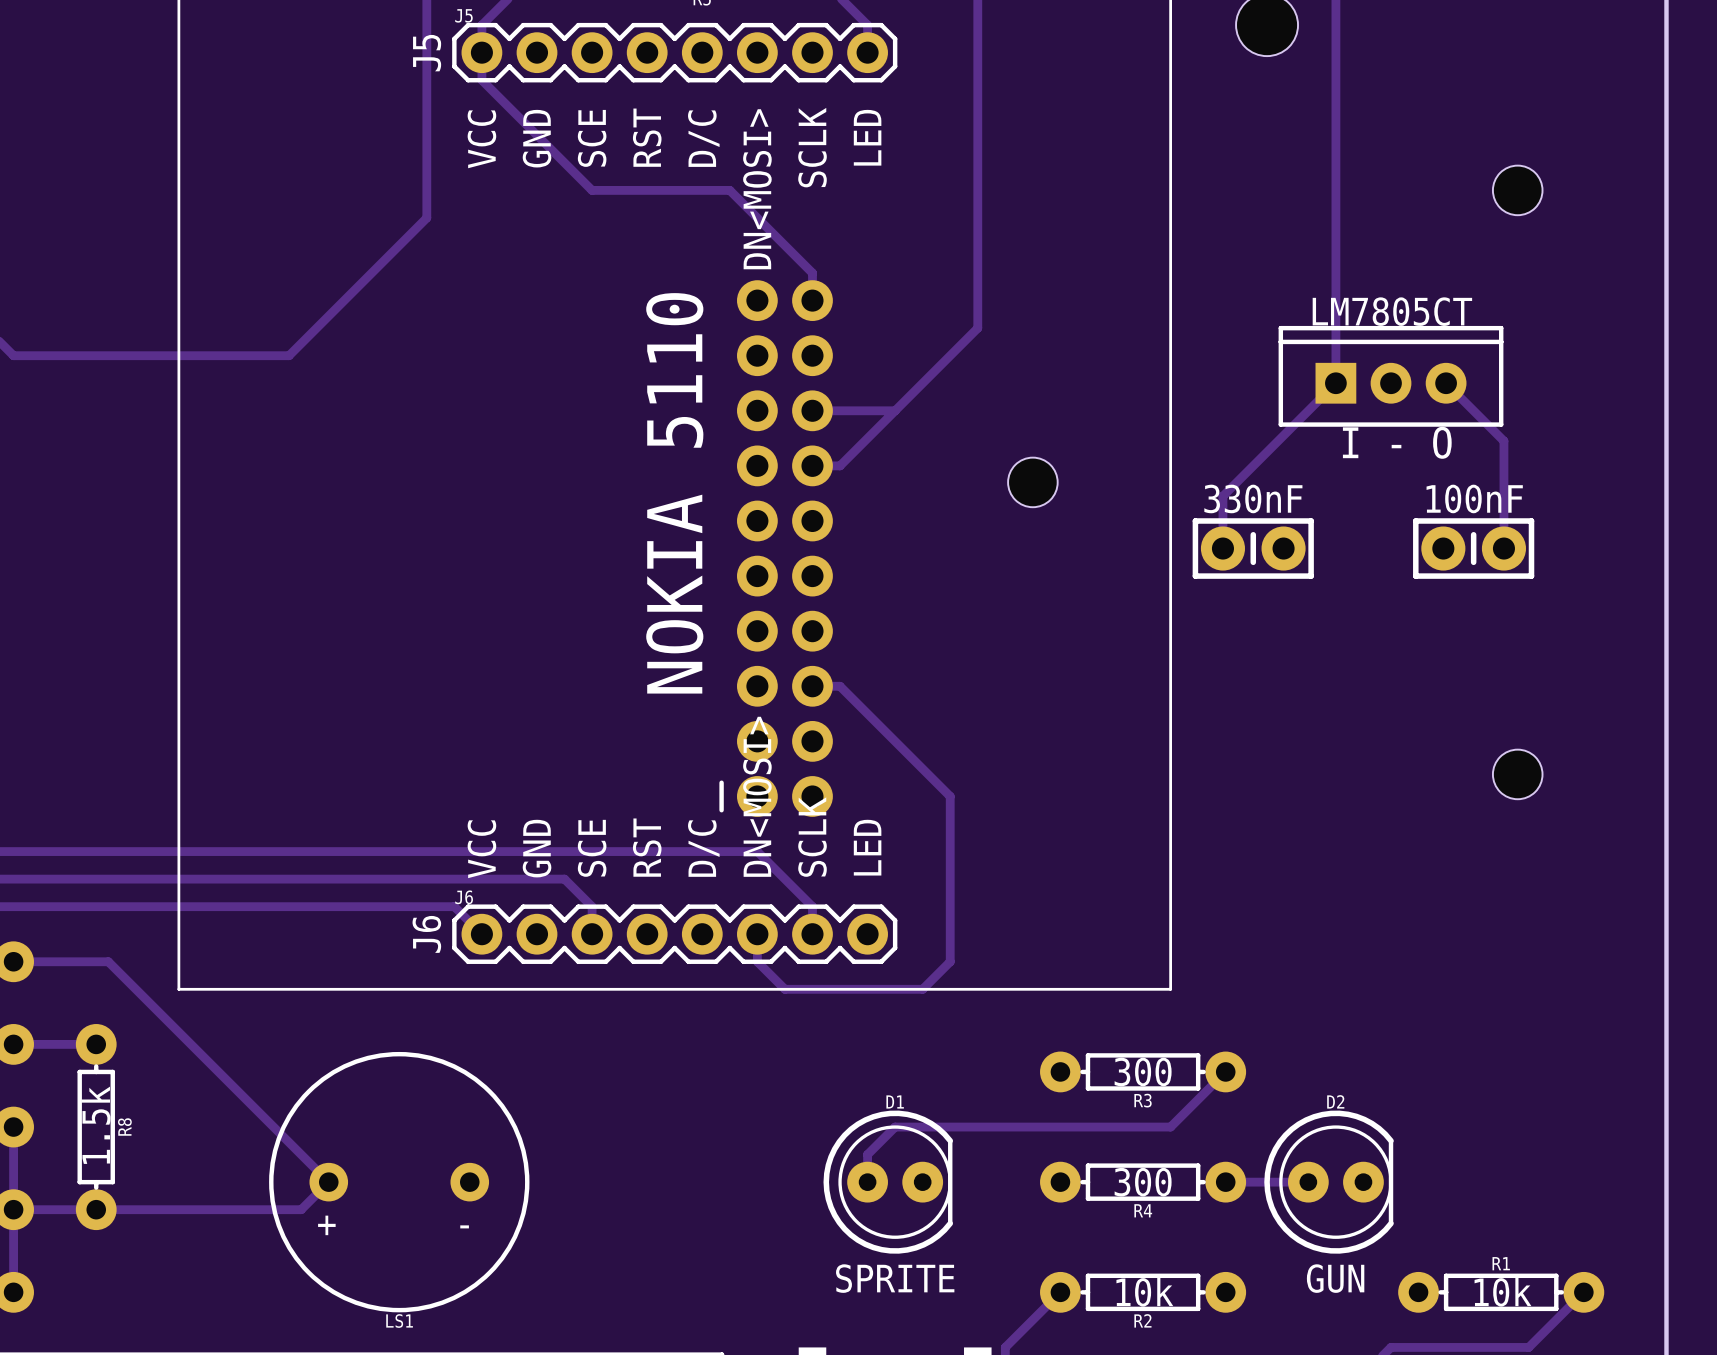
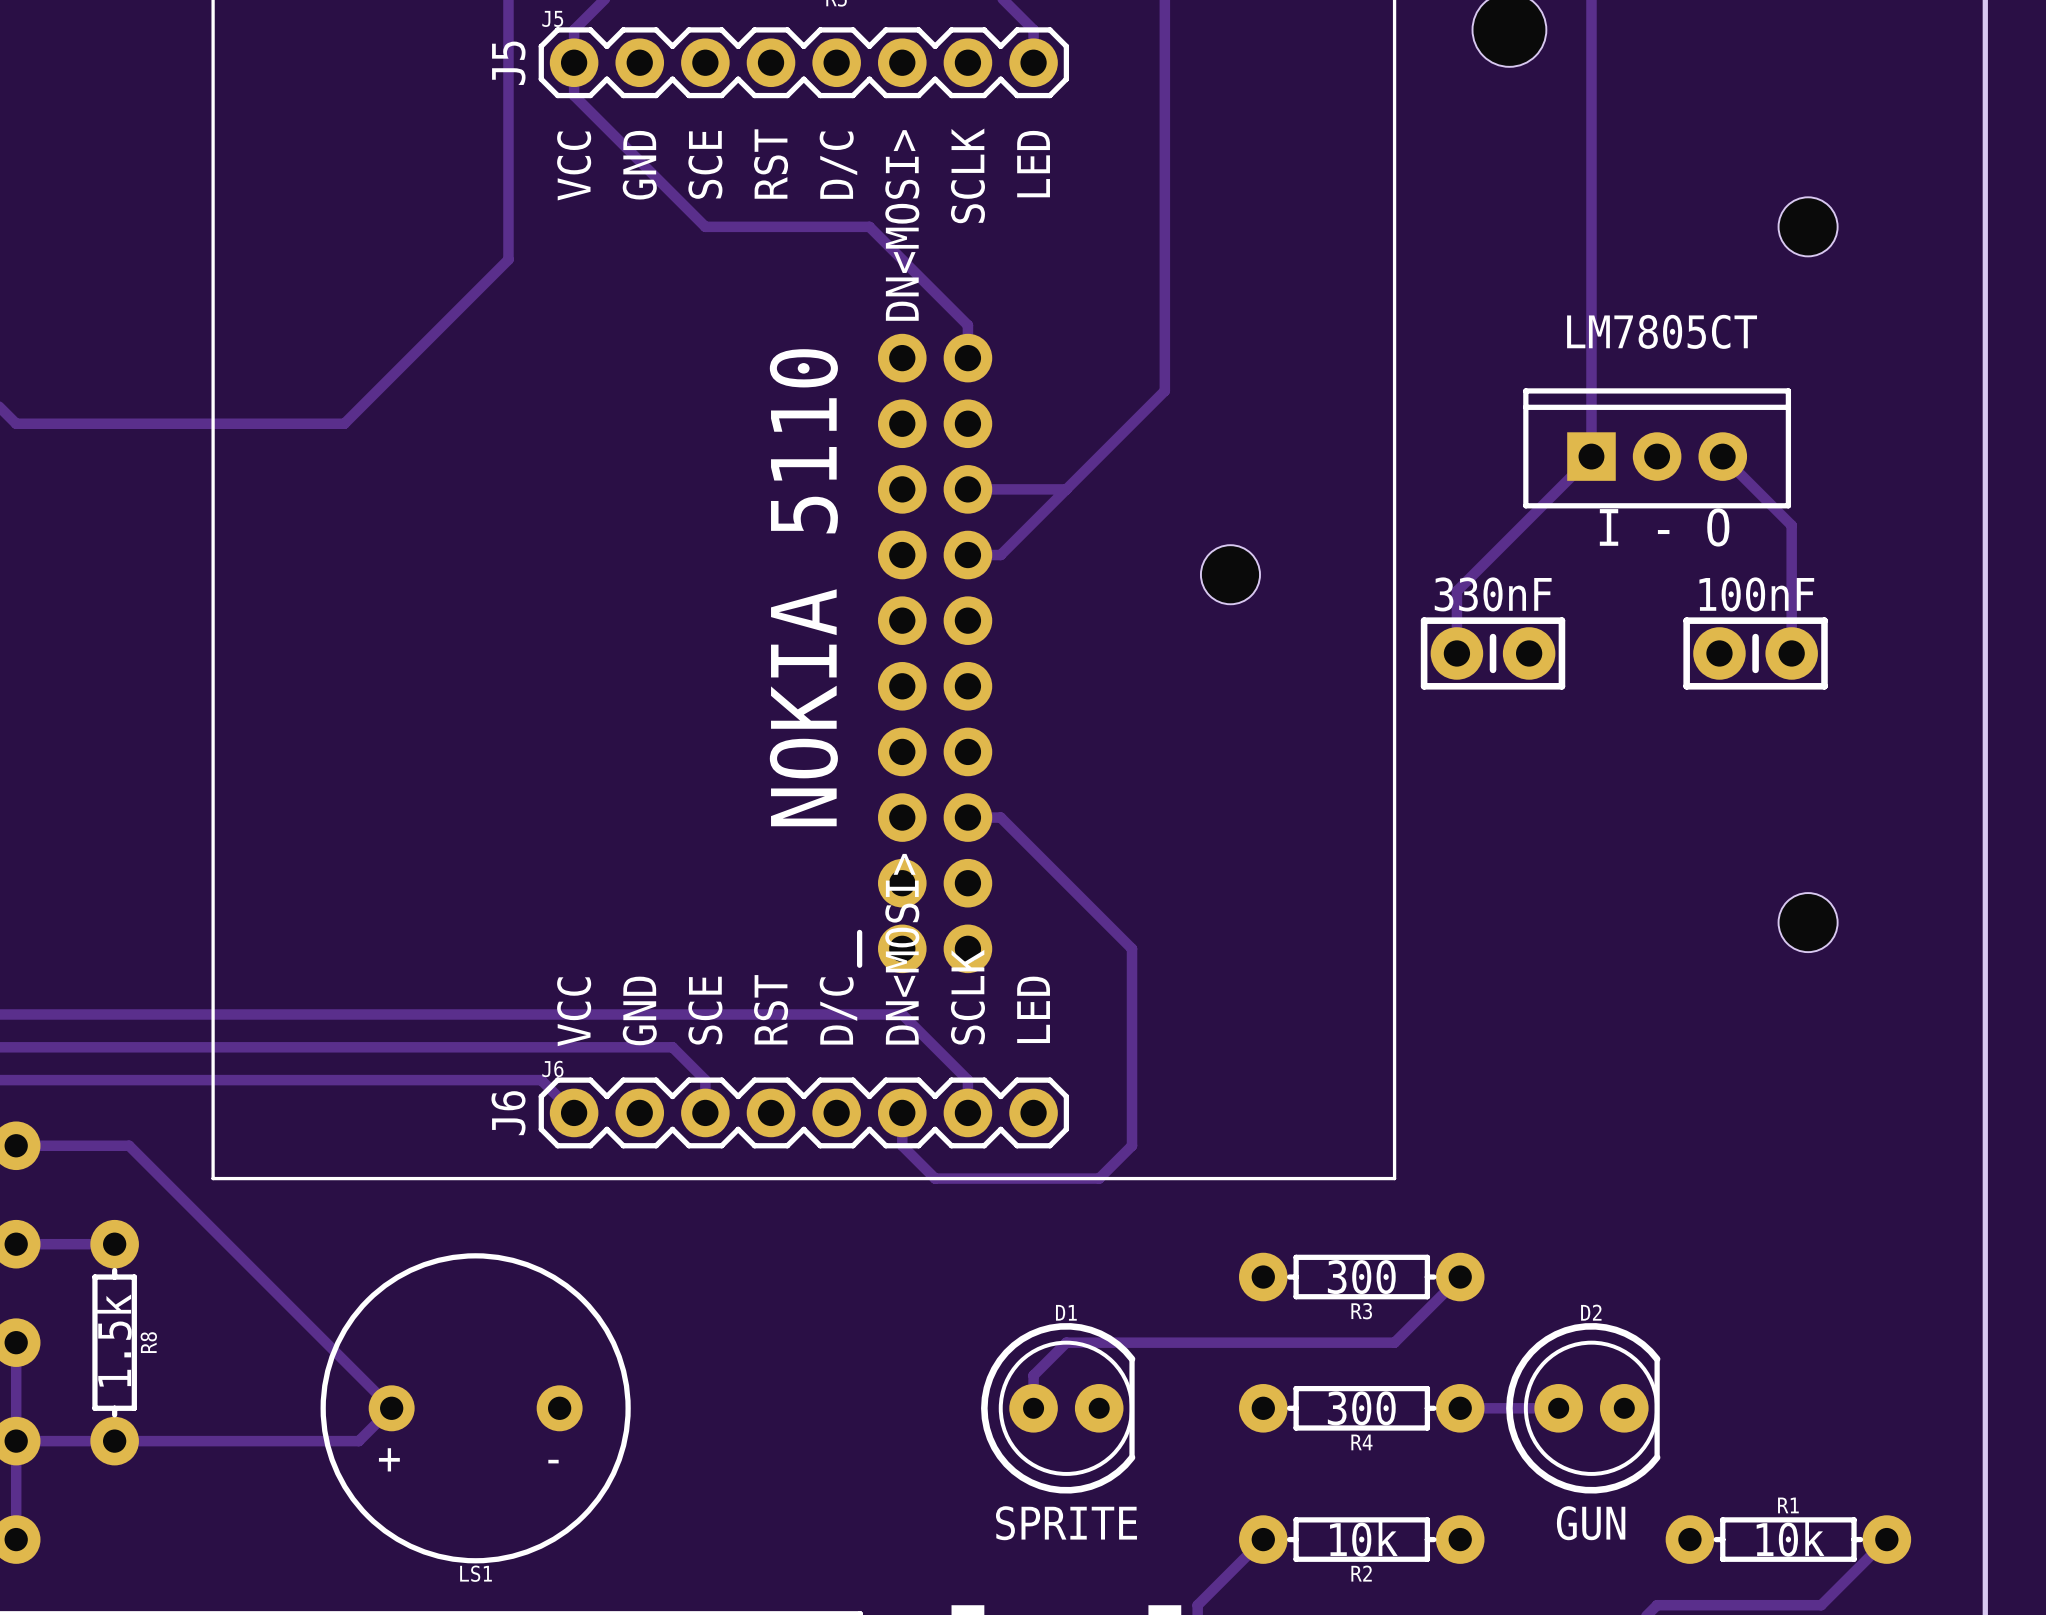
text position: LM7805CT (1392, 311) -> LM7805CT (1662, 331)

